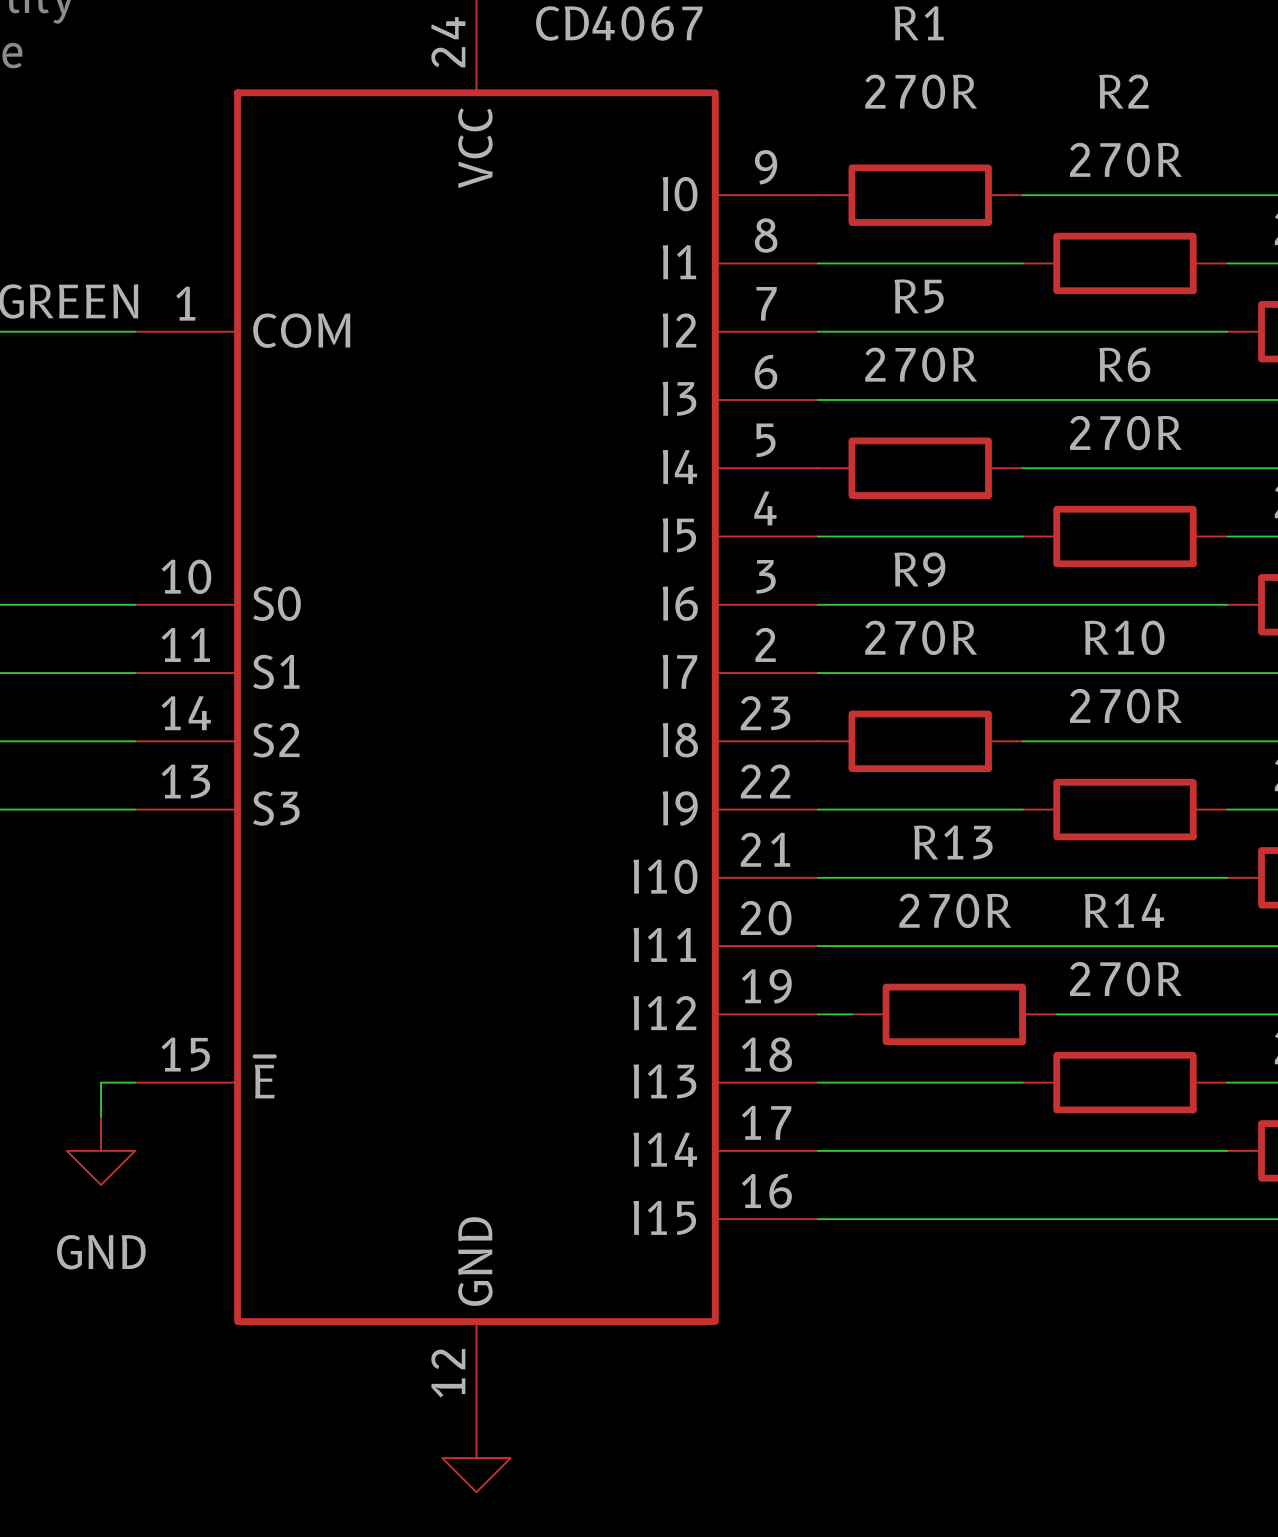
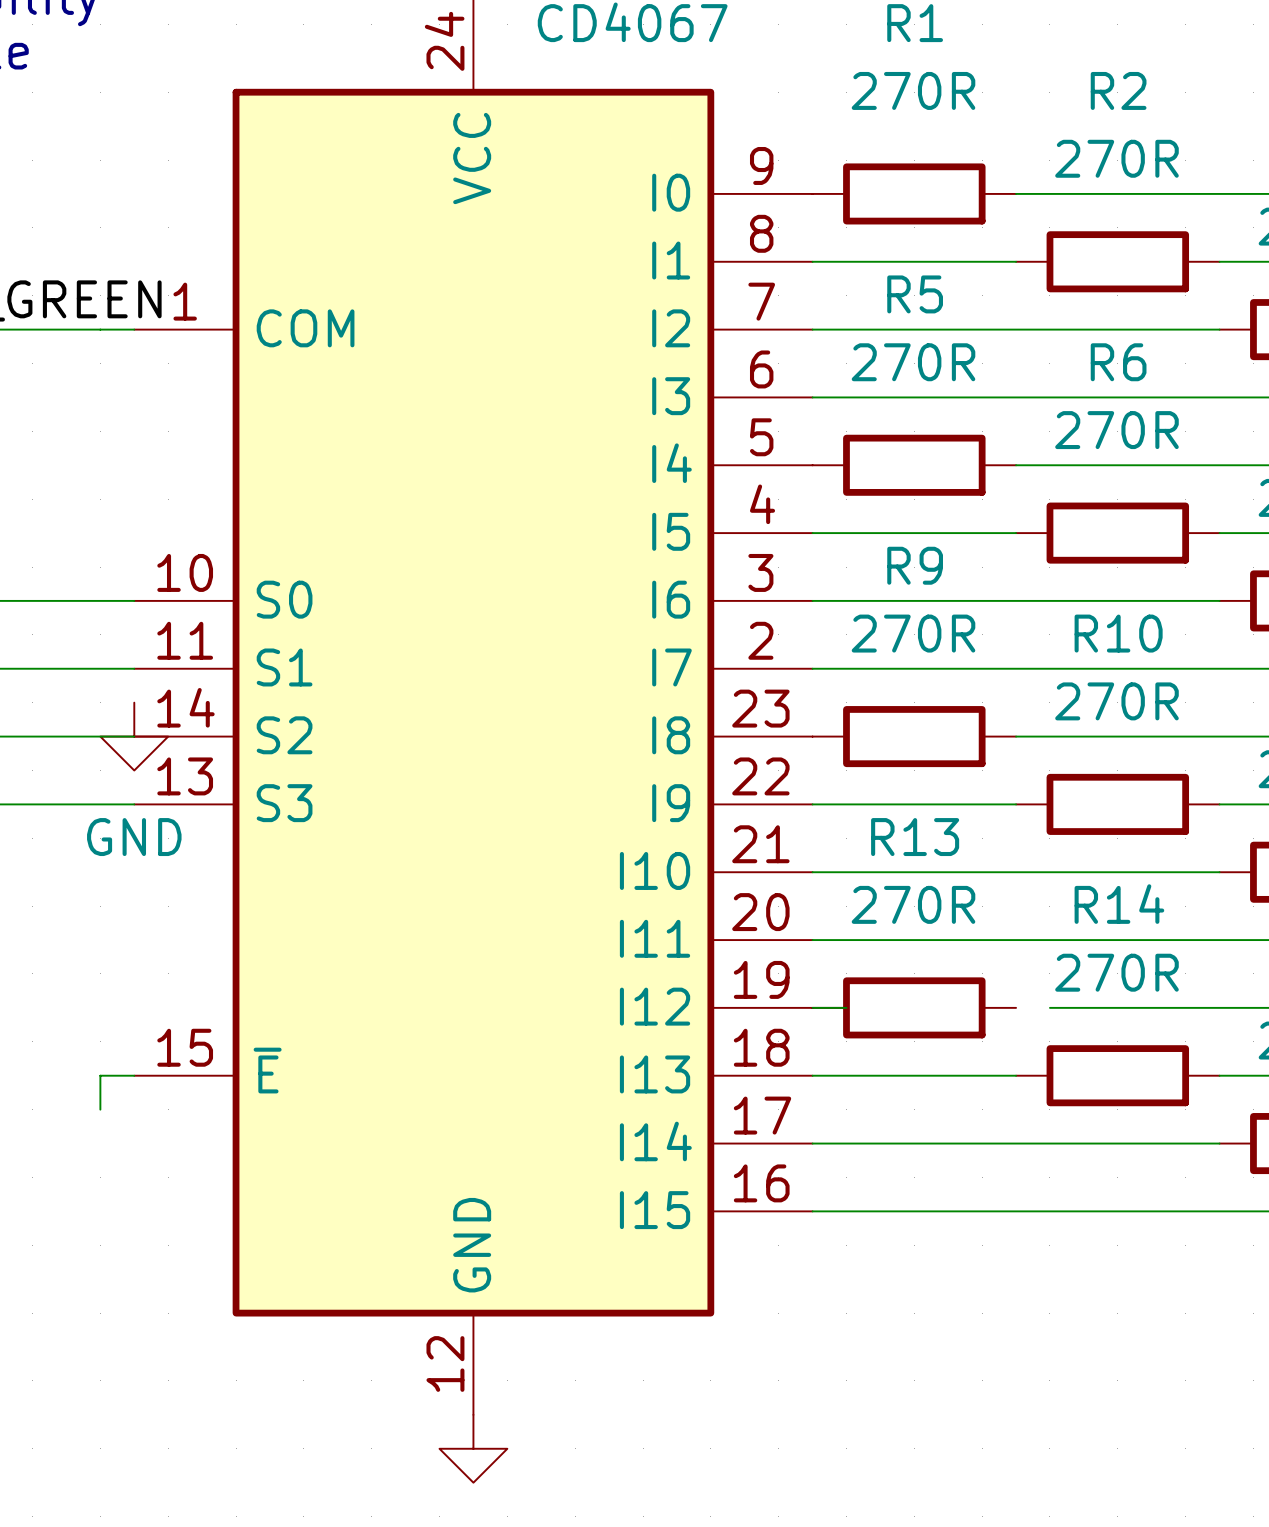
R13 position: (954, 1014) -> (914, 1007)
power symbol position: GND (101, 1150) -> GND (134, 736)

